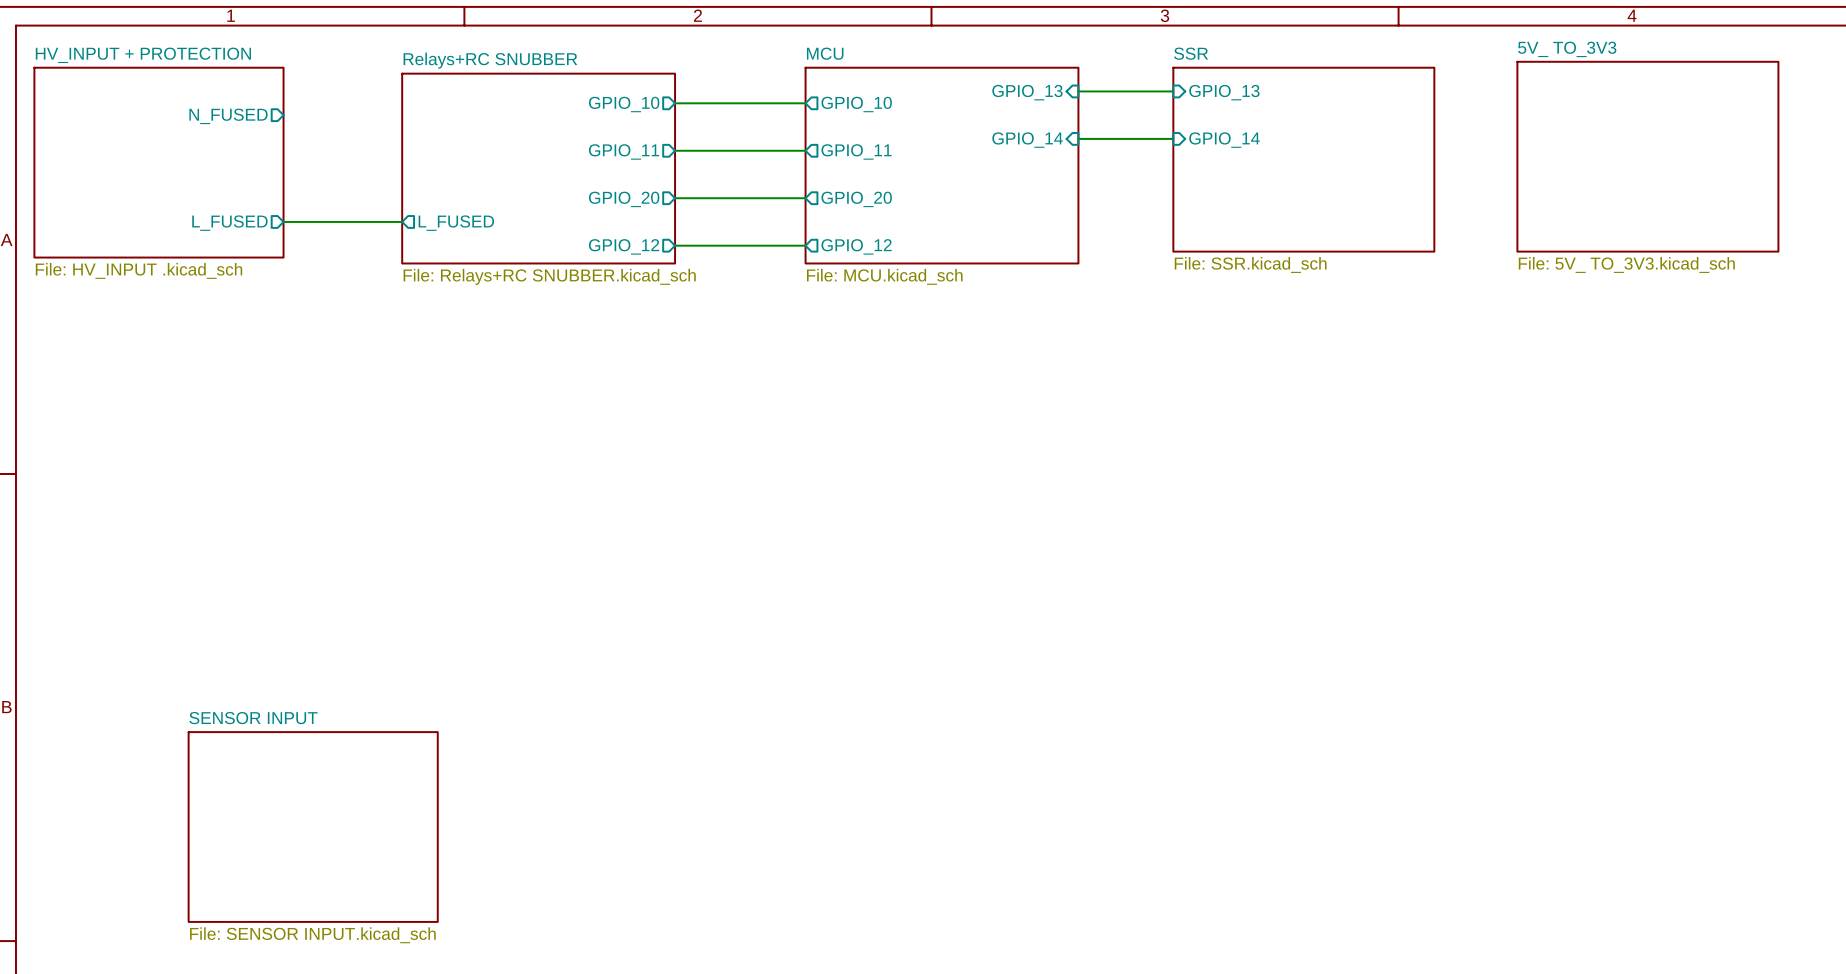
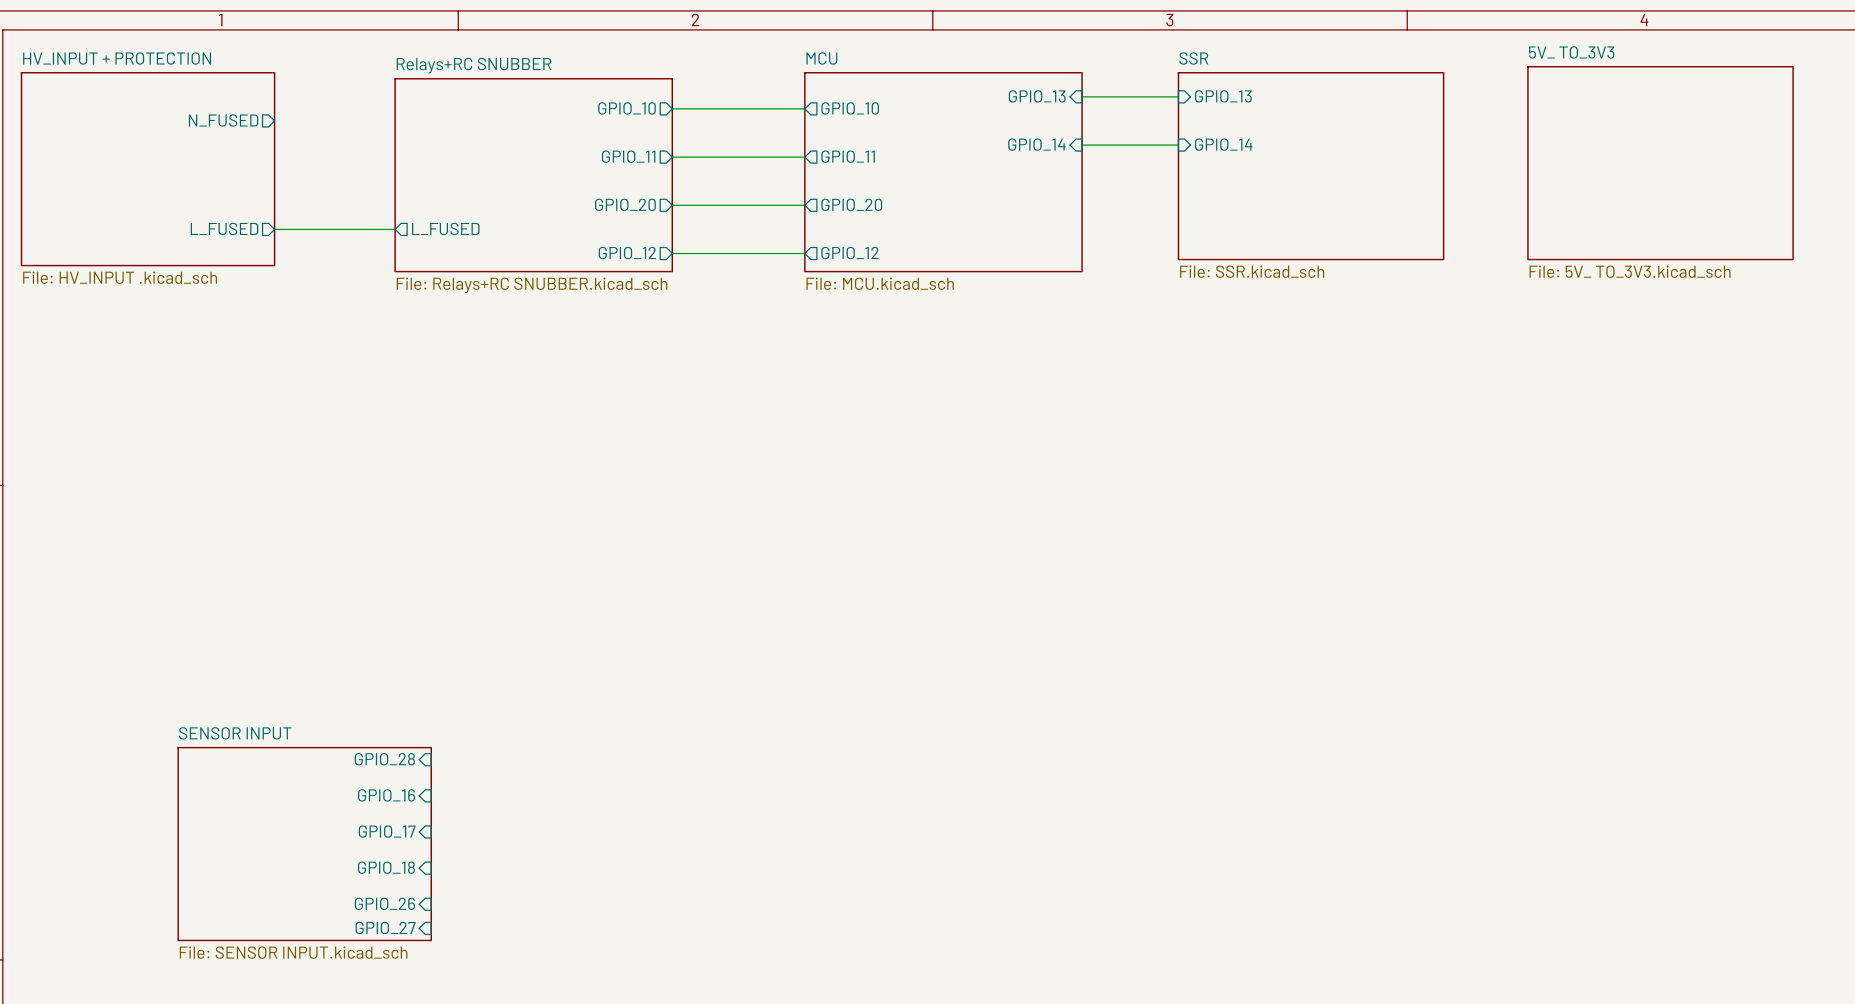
sheet pin: none -> GPIO_28 (384, 759)
sheet pin: none -> GPIO_16 (386, 795)
sheet pin: none -> GPIO_17 (387, 831)
sheet pin: none -> GPIO_18 (386, 867)
sheet pin: none -> GPIO_26 (384, 903)
sheet pin: none -> GPIO_27 (385, 927)

